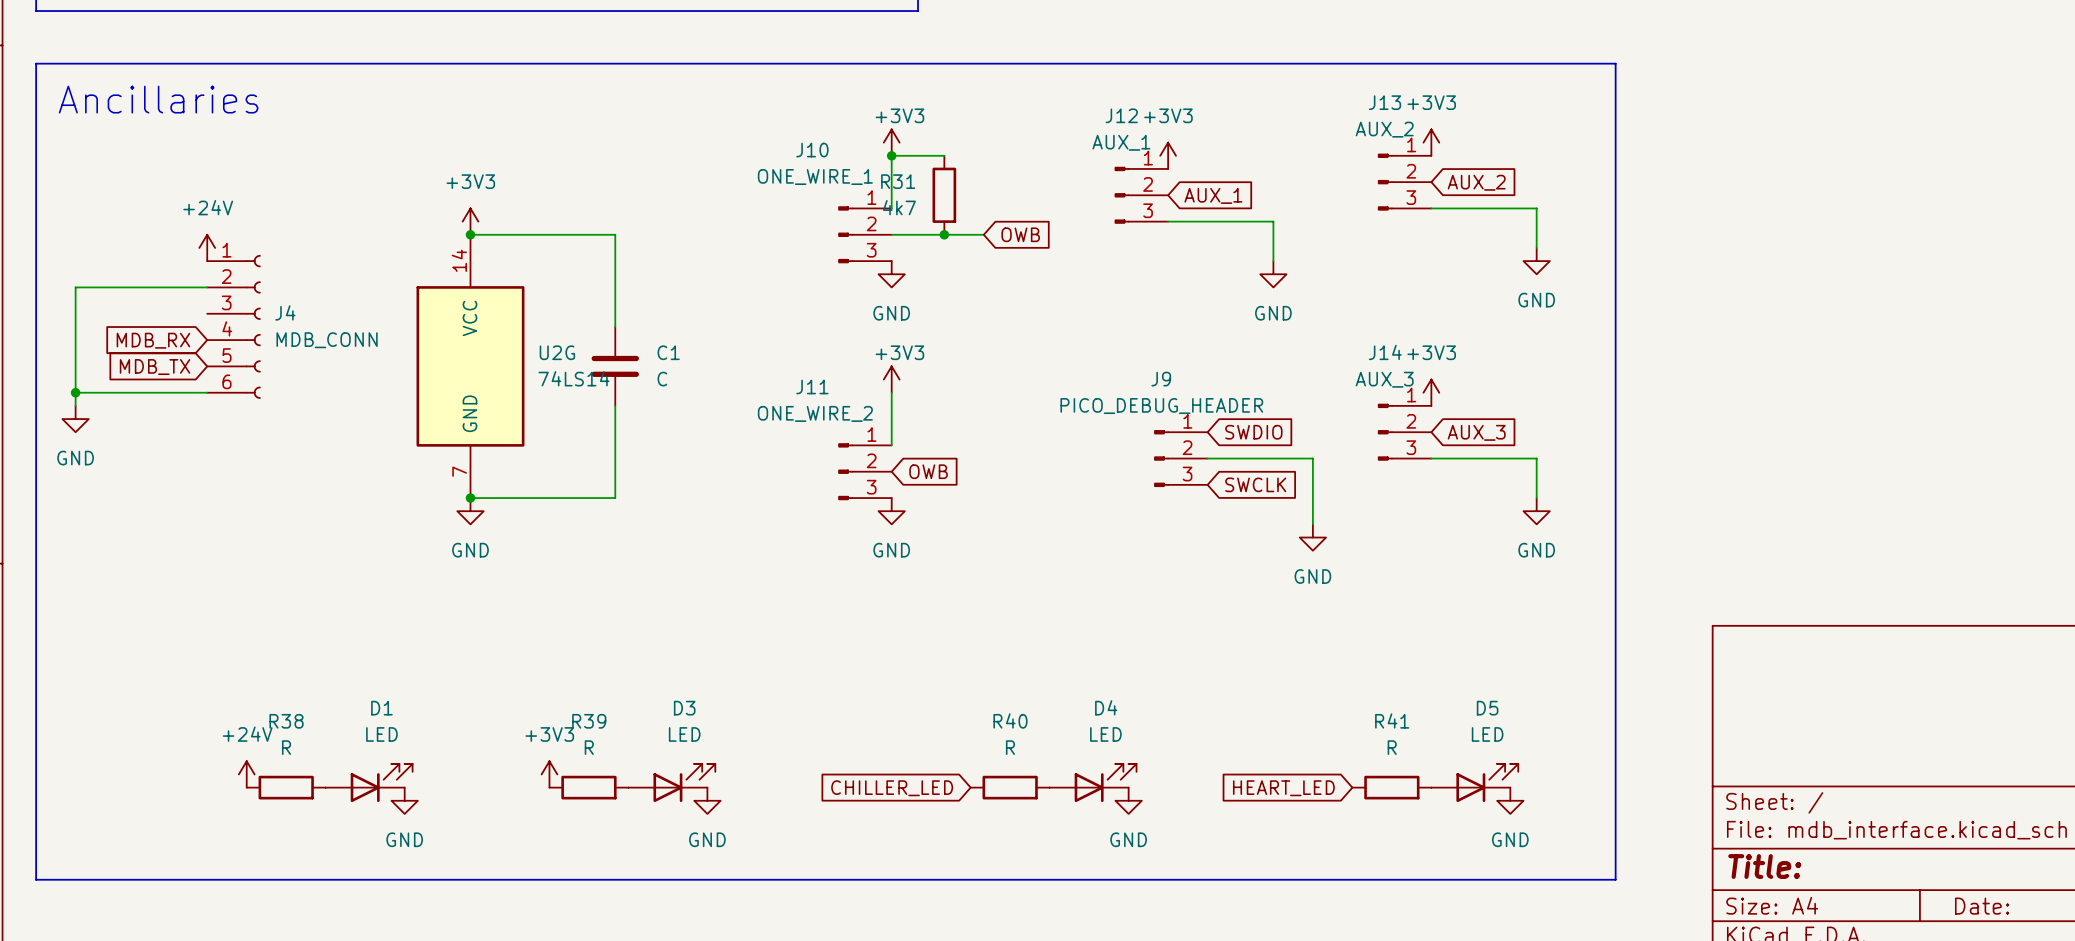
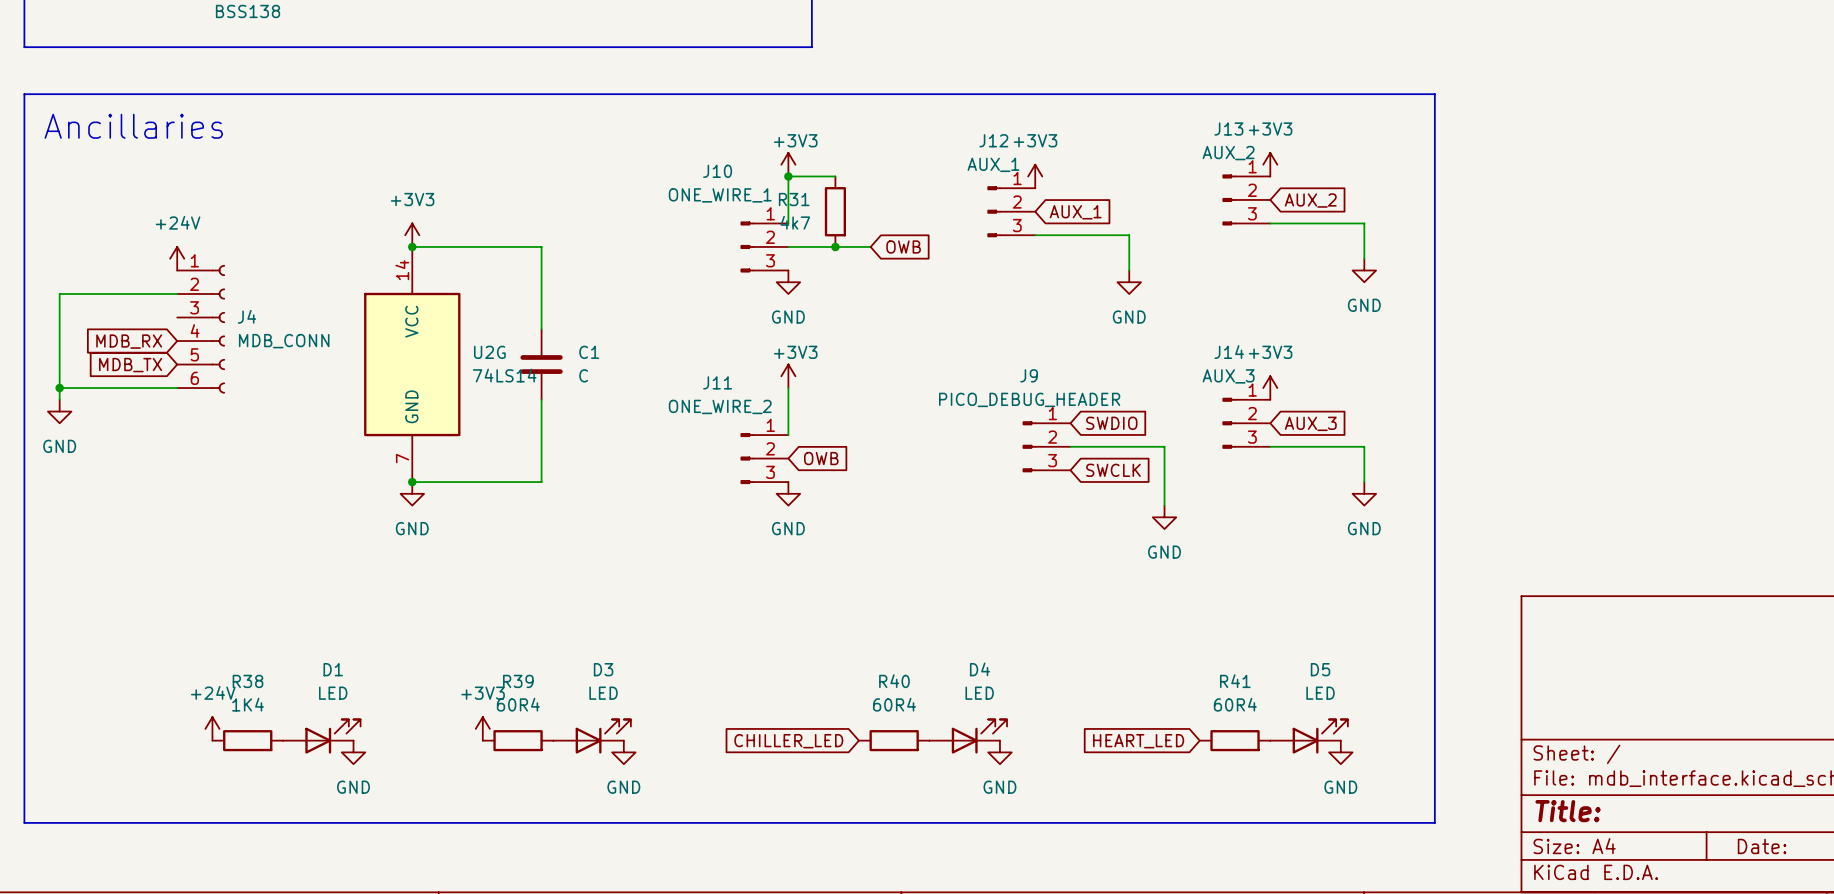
R38 value: R (286, 747) -> 1K4 (248, 704)
R39 value: R (589, 747) -> 60R4 (518, 704)
R40 value: R (1010, 747) -> 60R4 (894, 704)
R41 value: R (1392, 747) -> 60R4 (1235, 704)

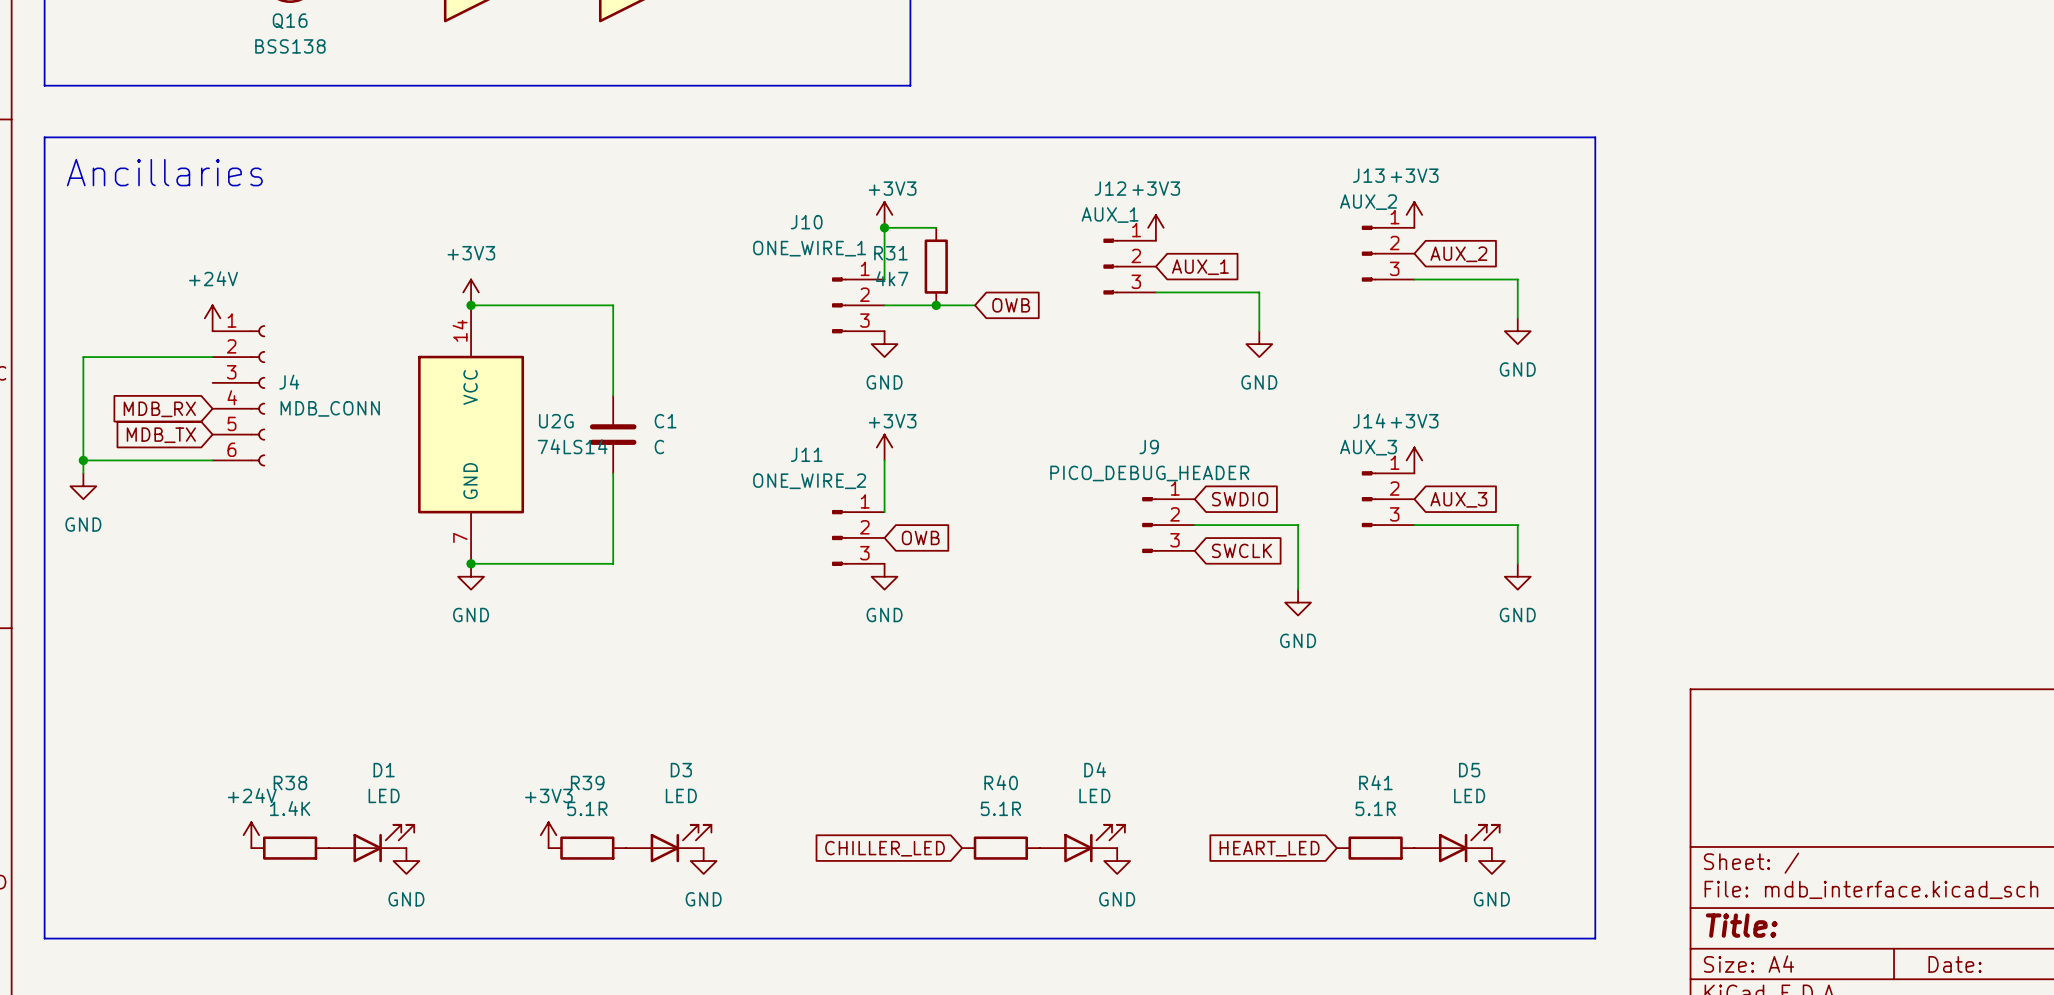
R38 value: 1K4 (248, 704) -> 1.4K (290, 808)
R39 value: 60R4 (518, 704) -> 5.1R (587, 808)
R40 value: 60R4 (894, 704) -> 5.1R (1000, 808)
R41 value: 60R4 (1235, 704) -> 5.1R (1375, 808)

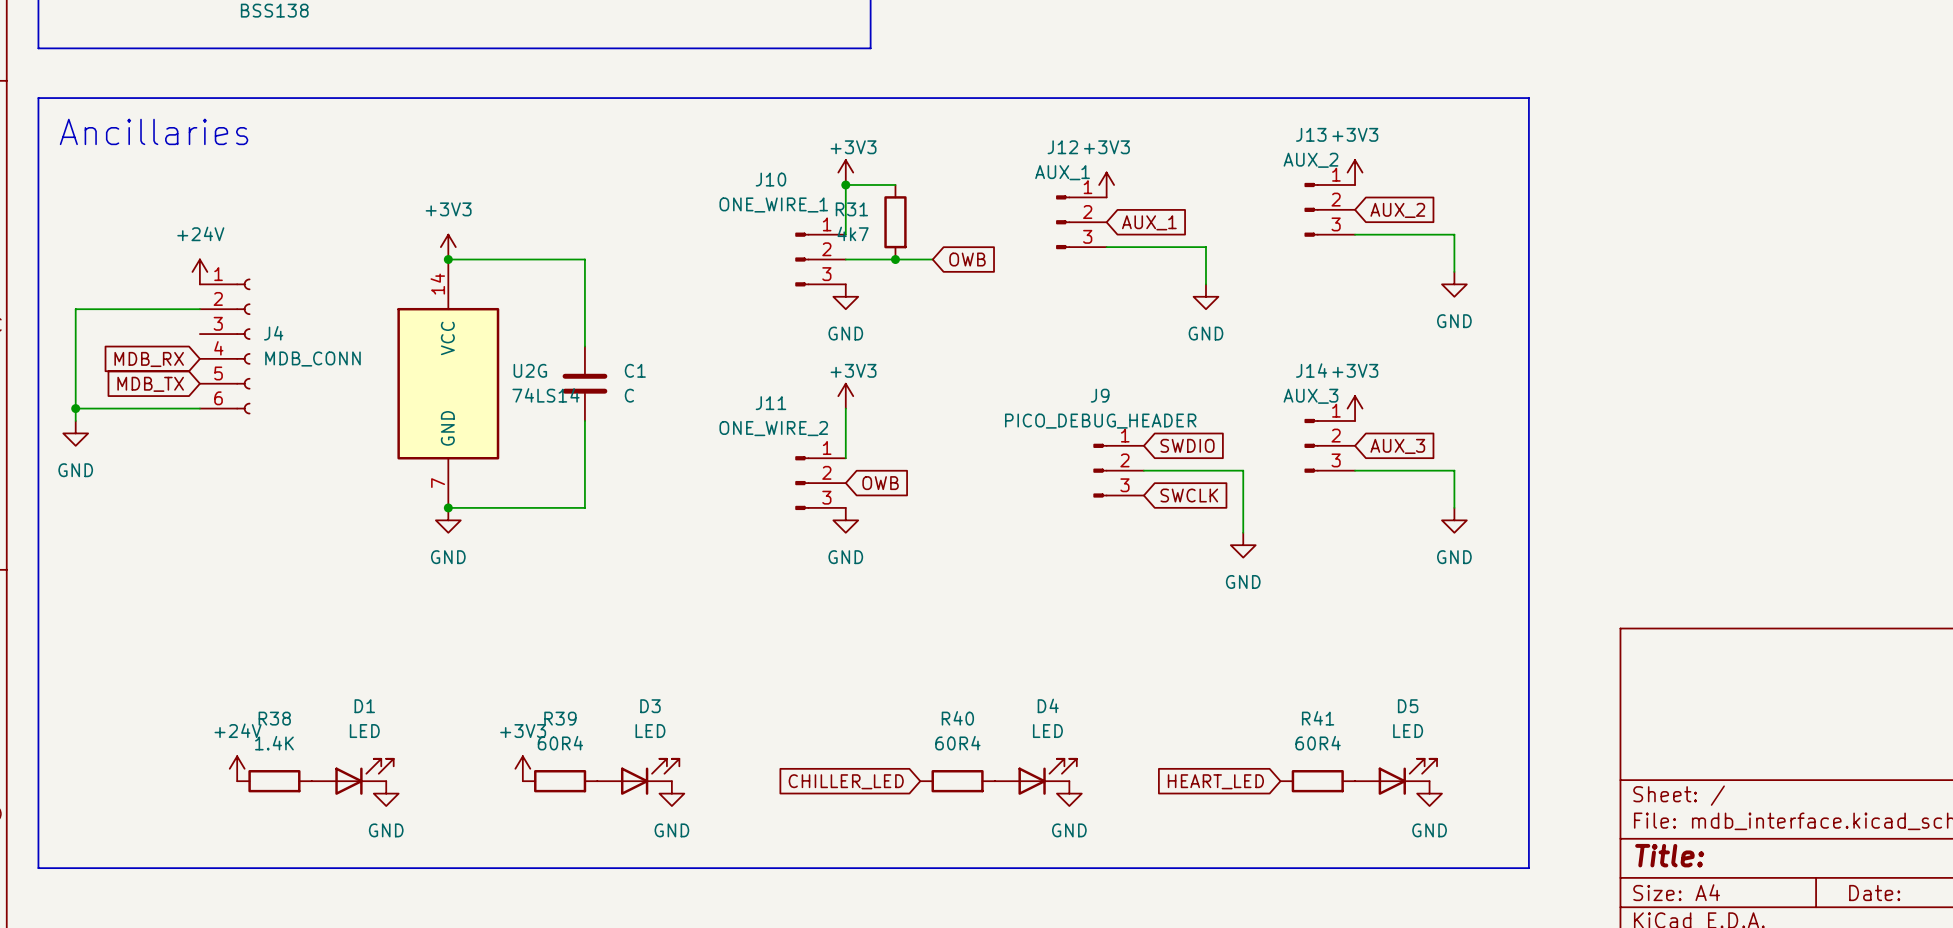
R39 value: 5.1R (587, 808) -> 60R4 (560, 743)
R40 value: 5.1R (1000, 808) -> 60R4 (957, 743)
R41 value: 5.1R (1375, 808) -> 60R4 (1318, 743)

